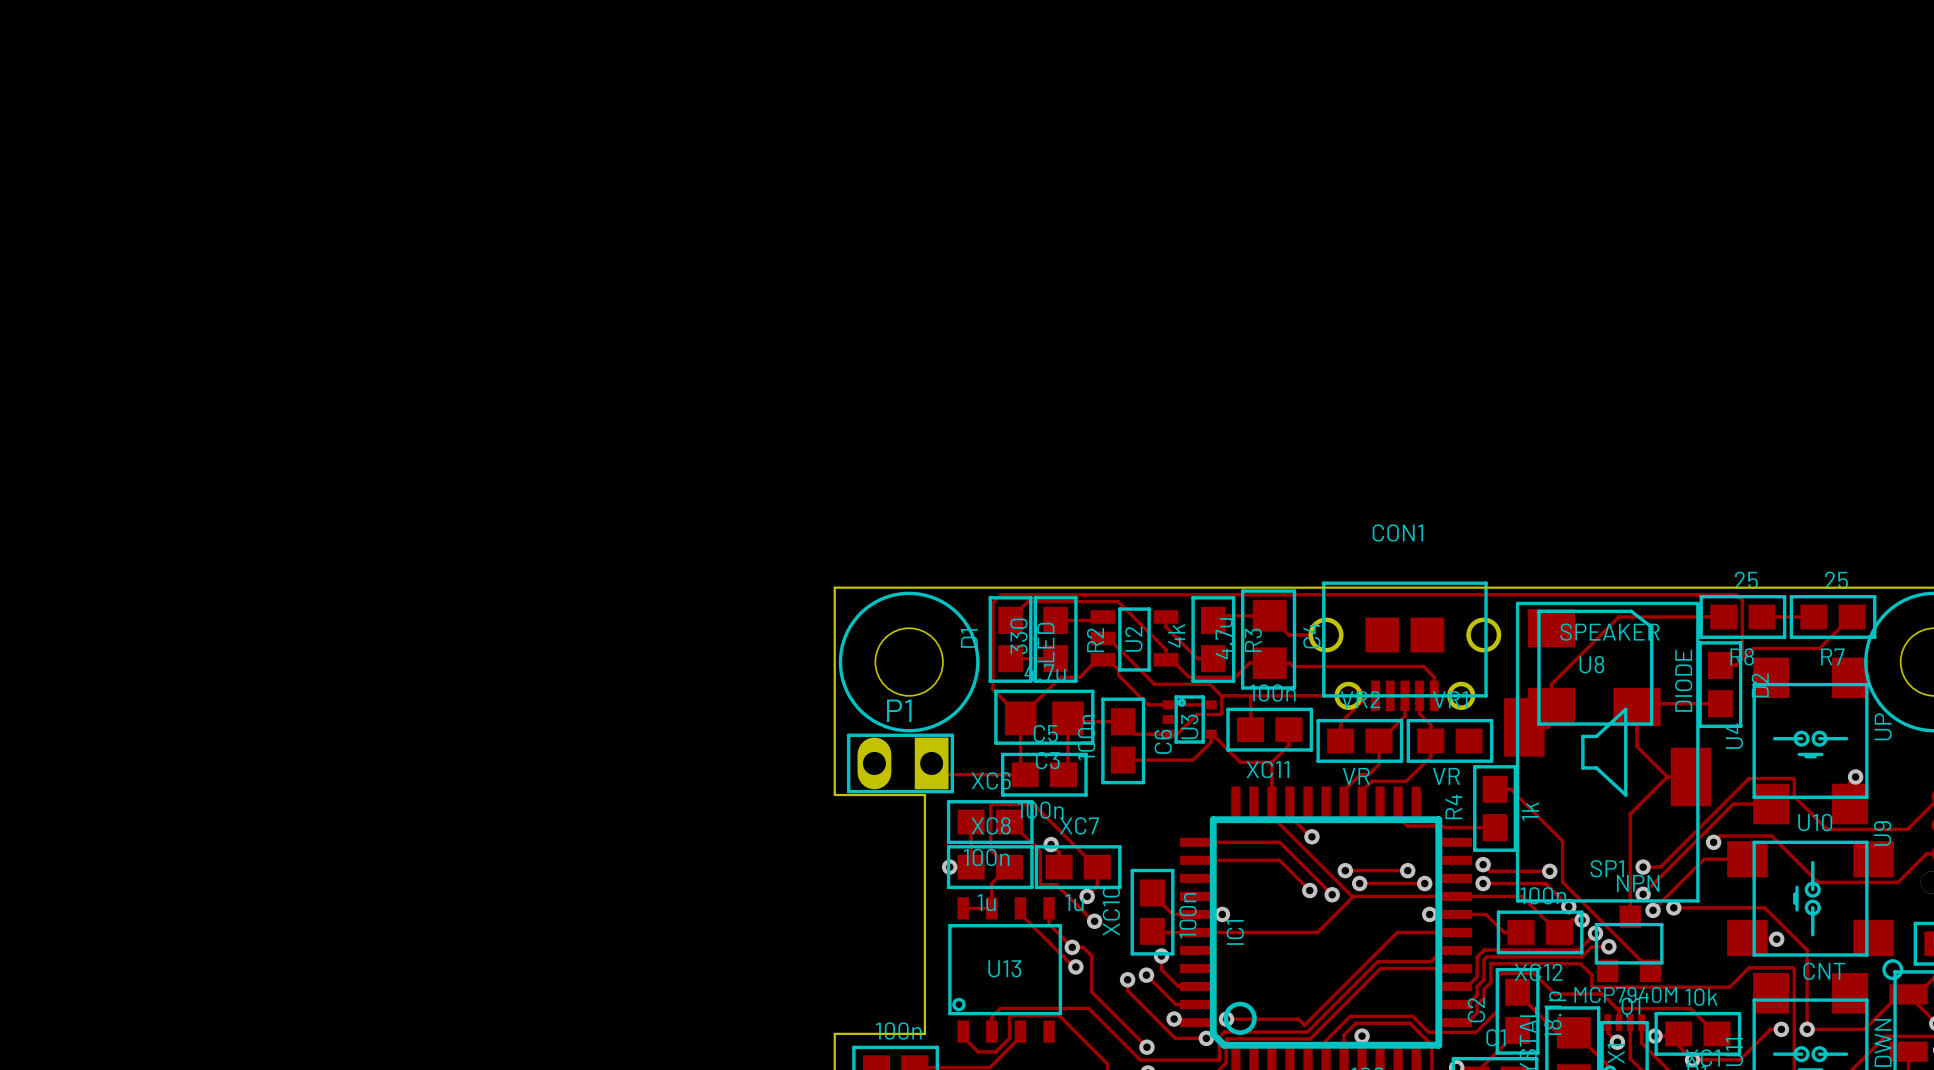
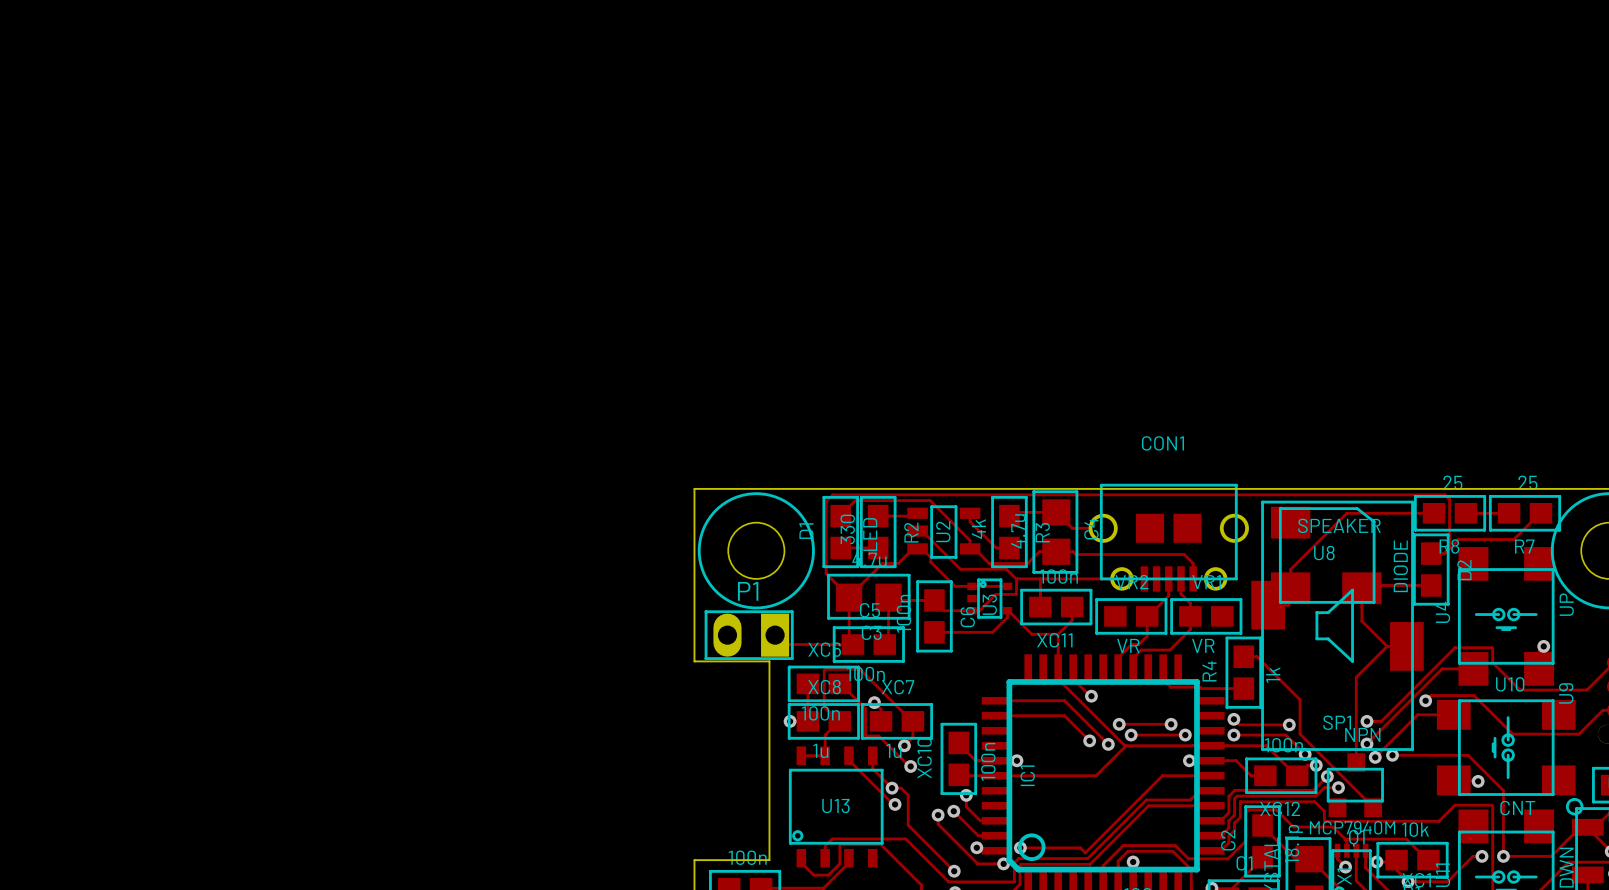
track: (1375, 695) (1367, 695) (1340, 722) (1340, 740) -> none

